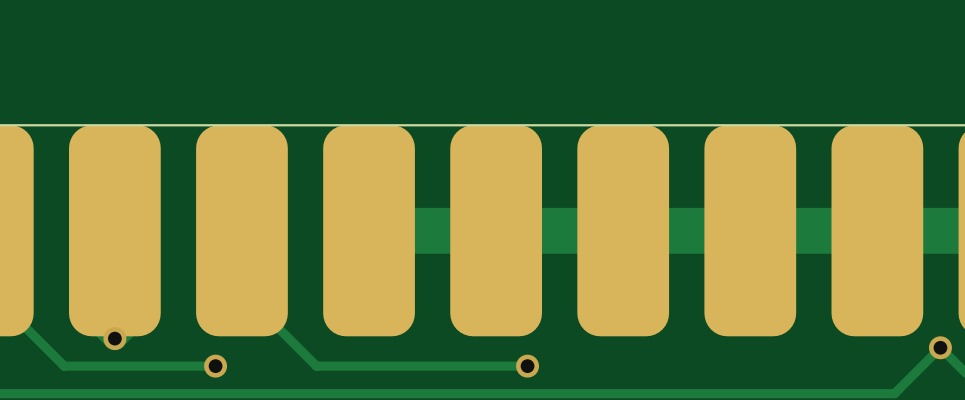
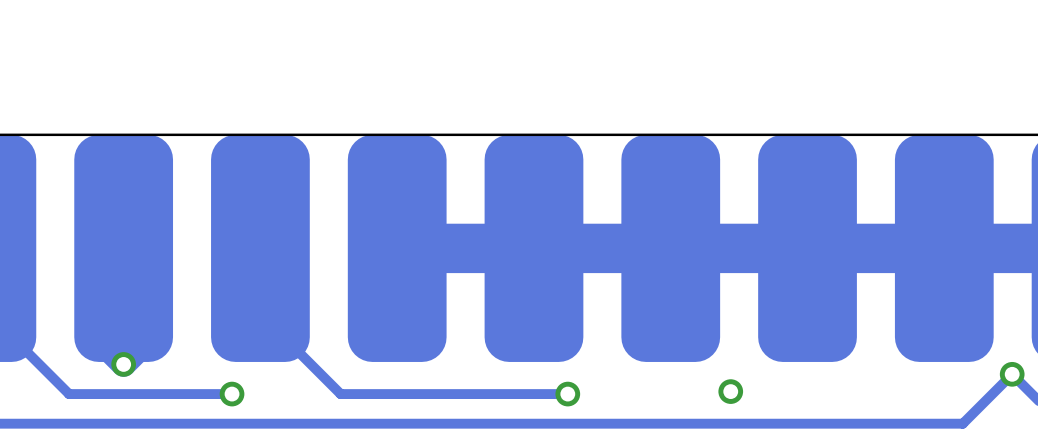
via: none -> (730, 391)

